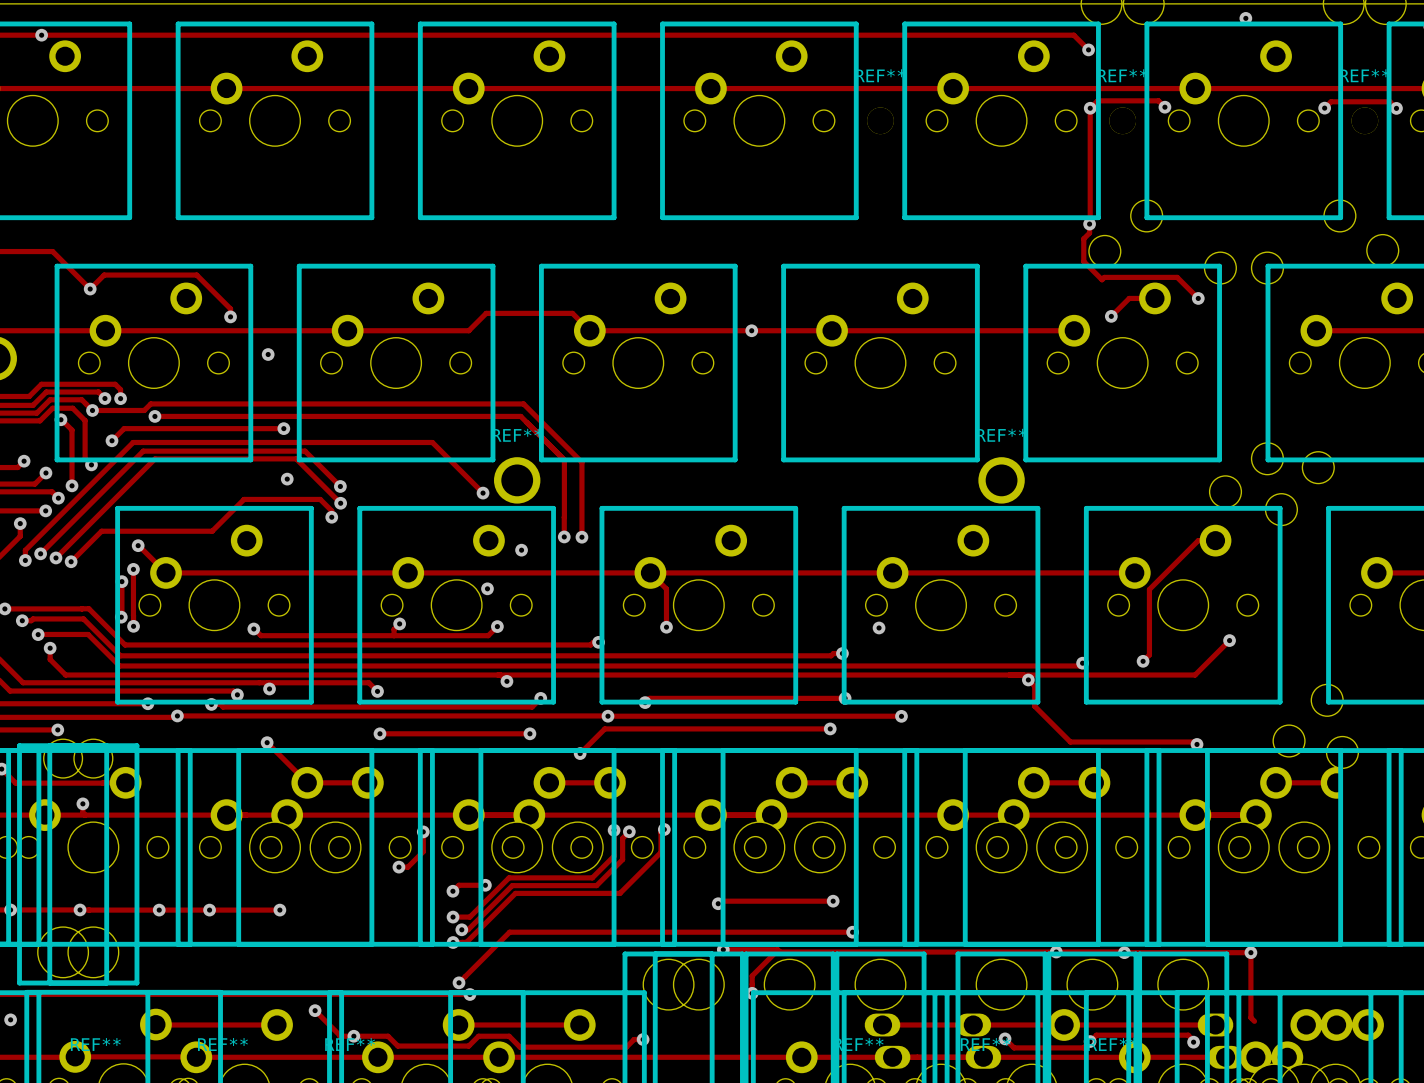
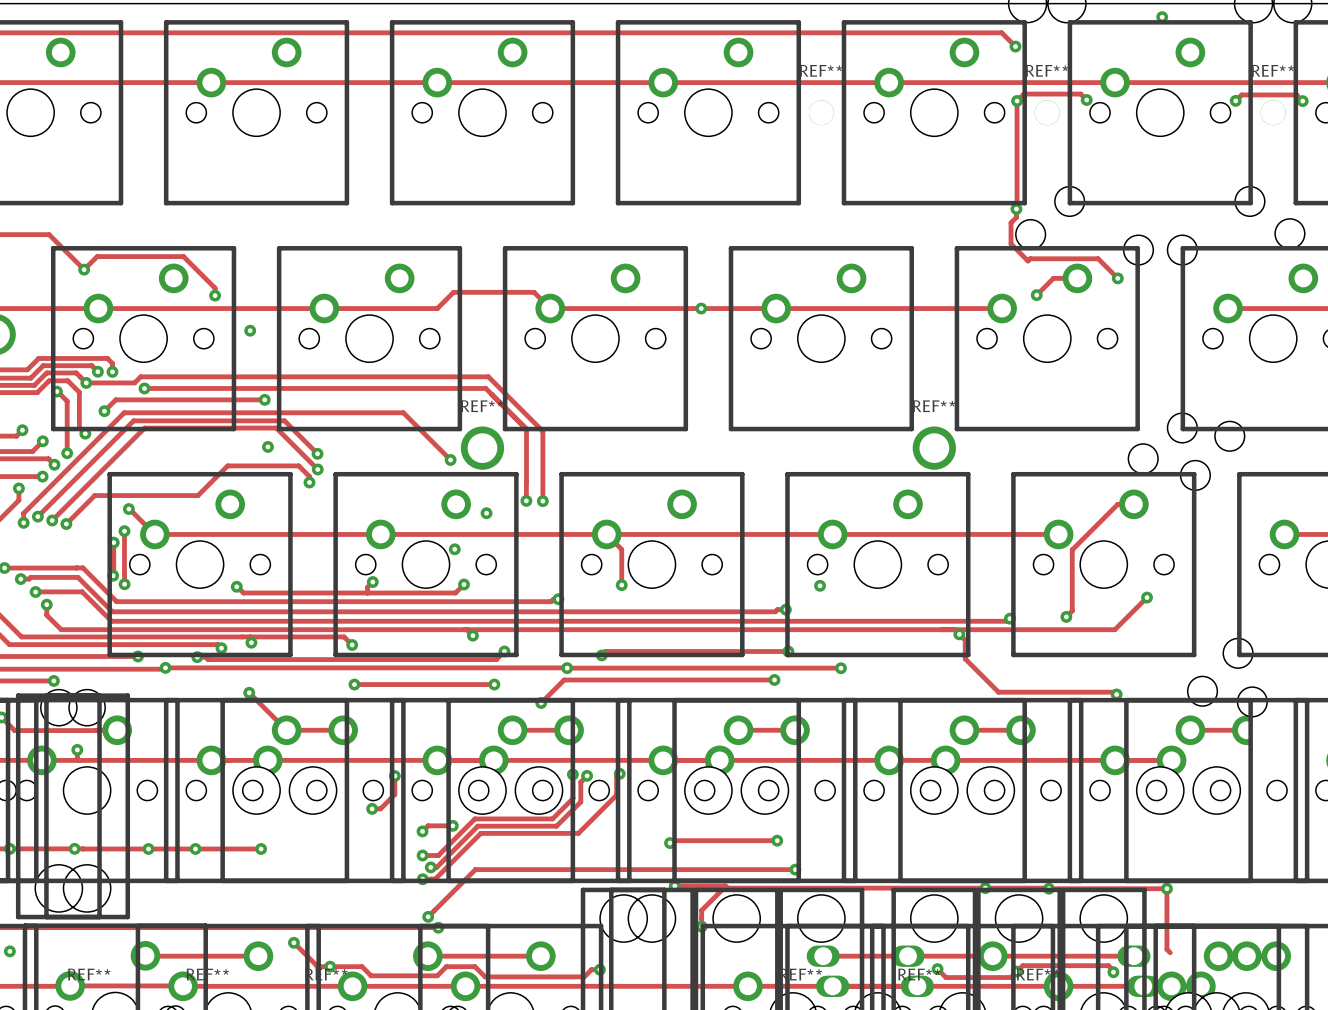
via: (41, 35) -> none

